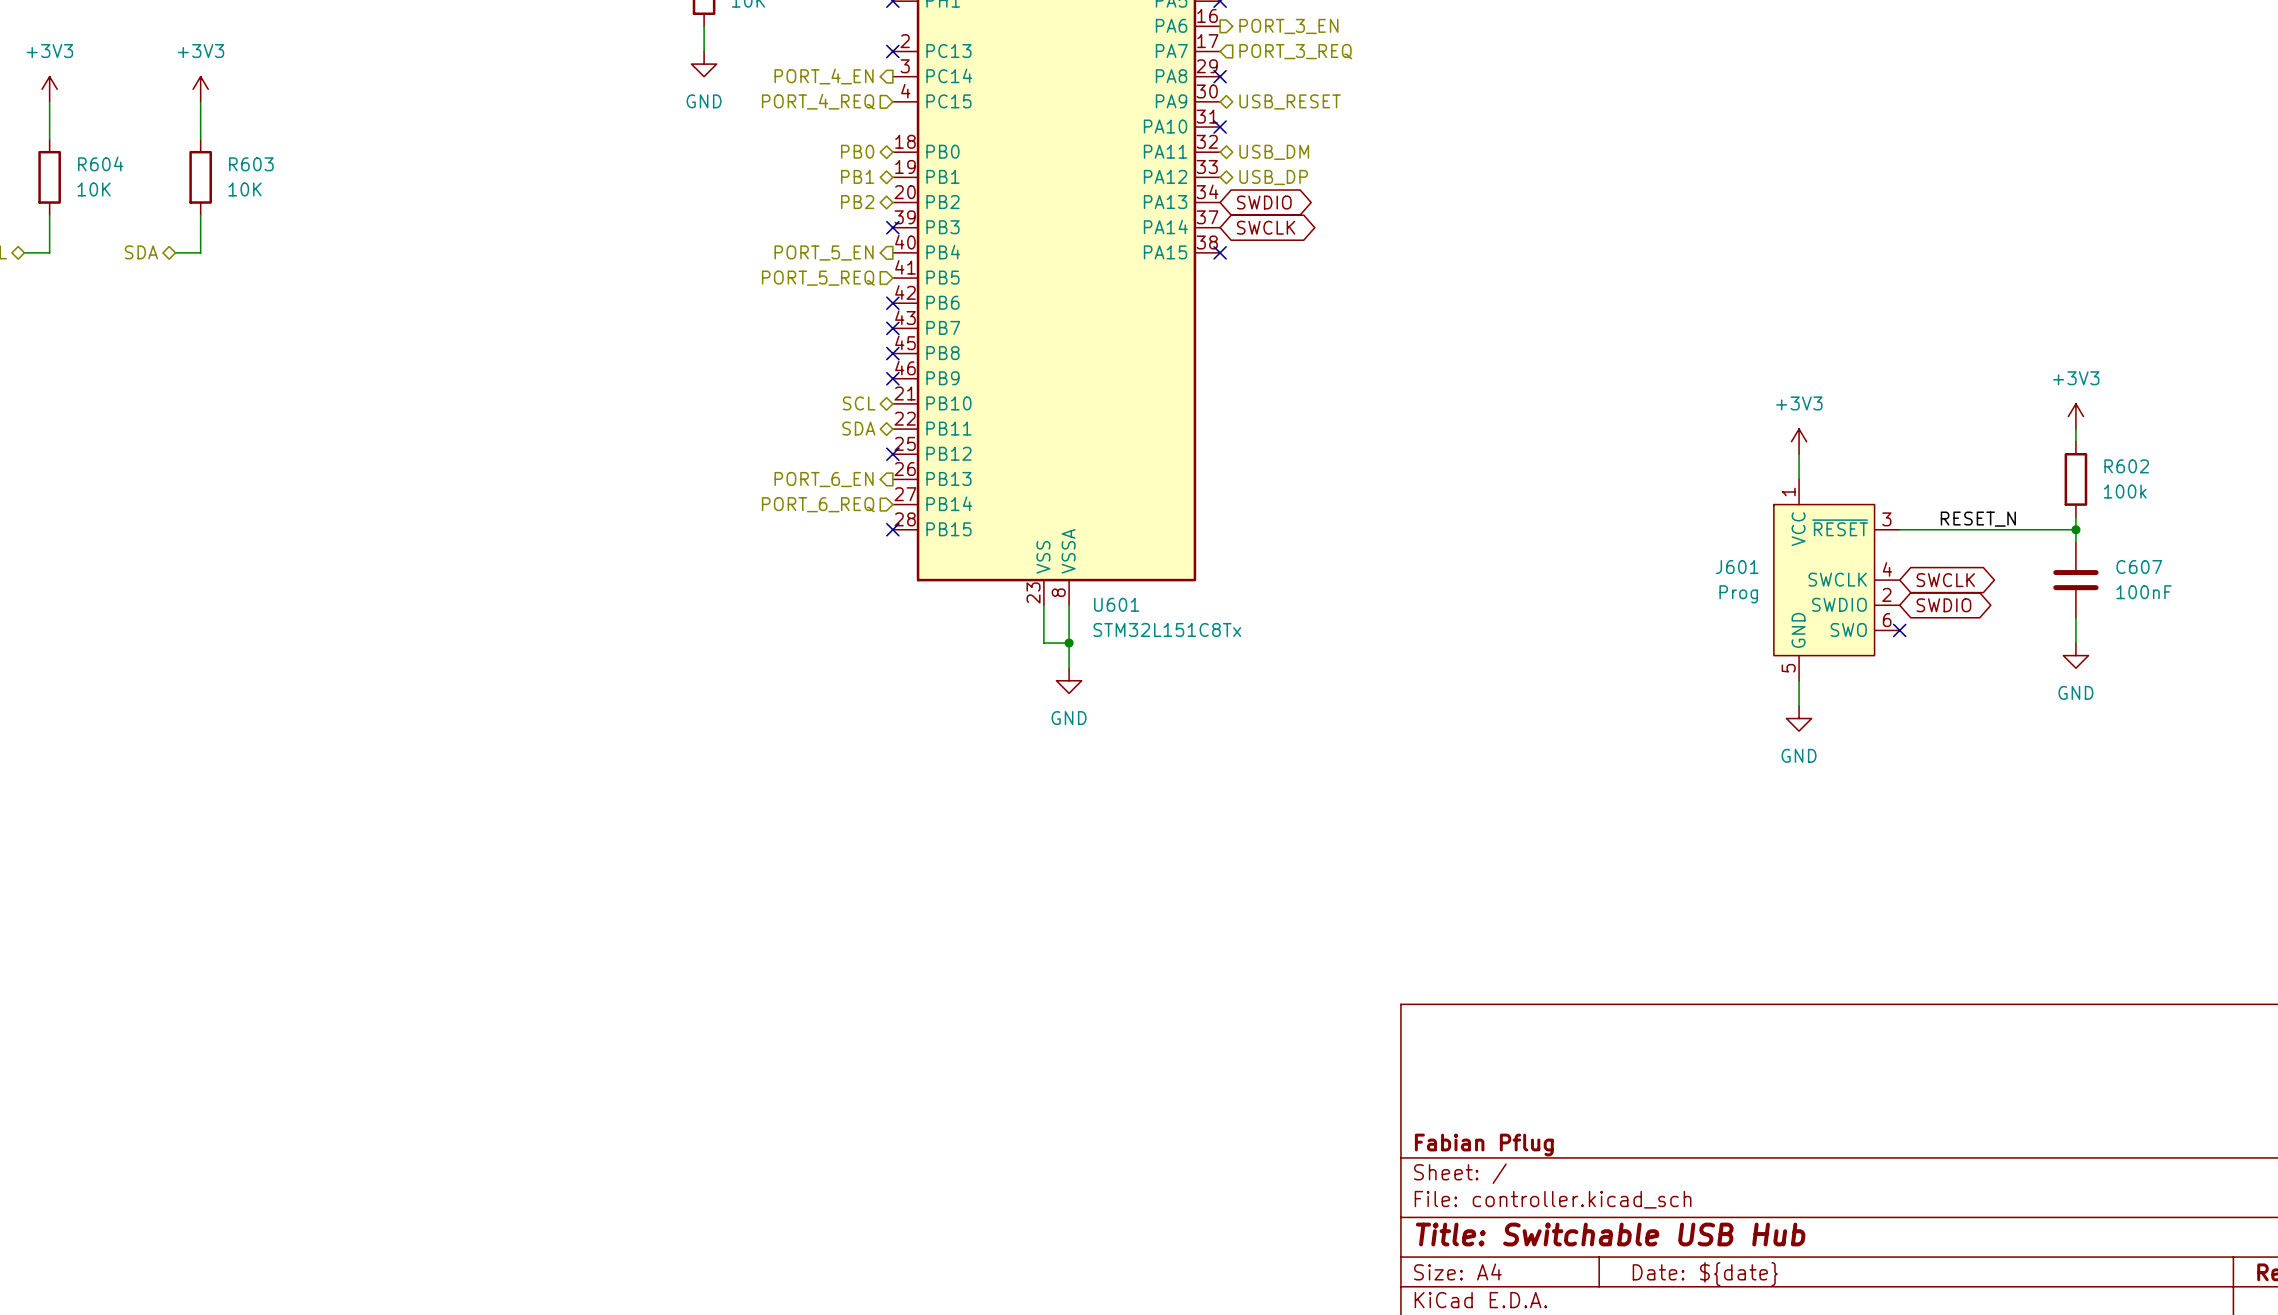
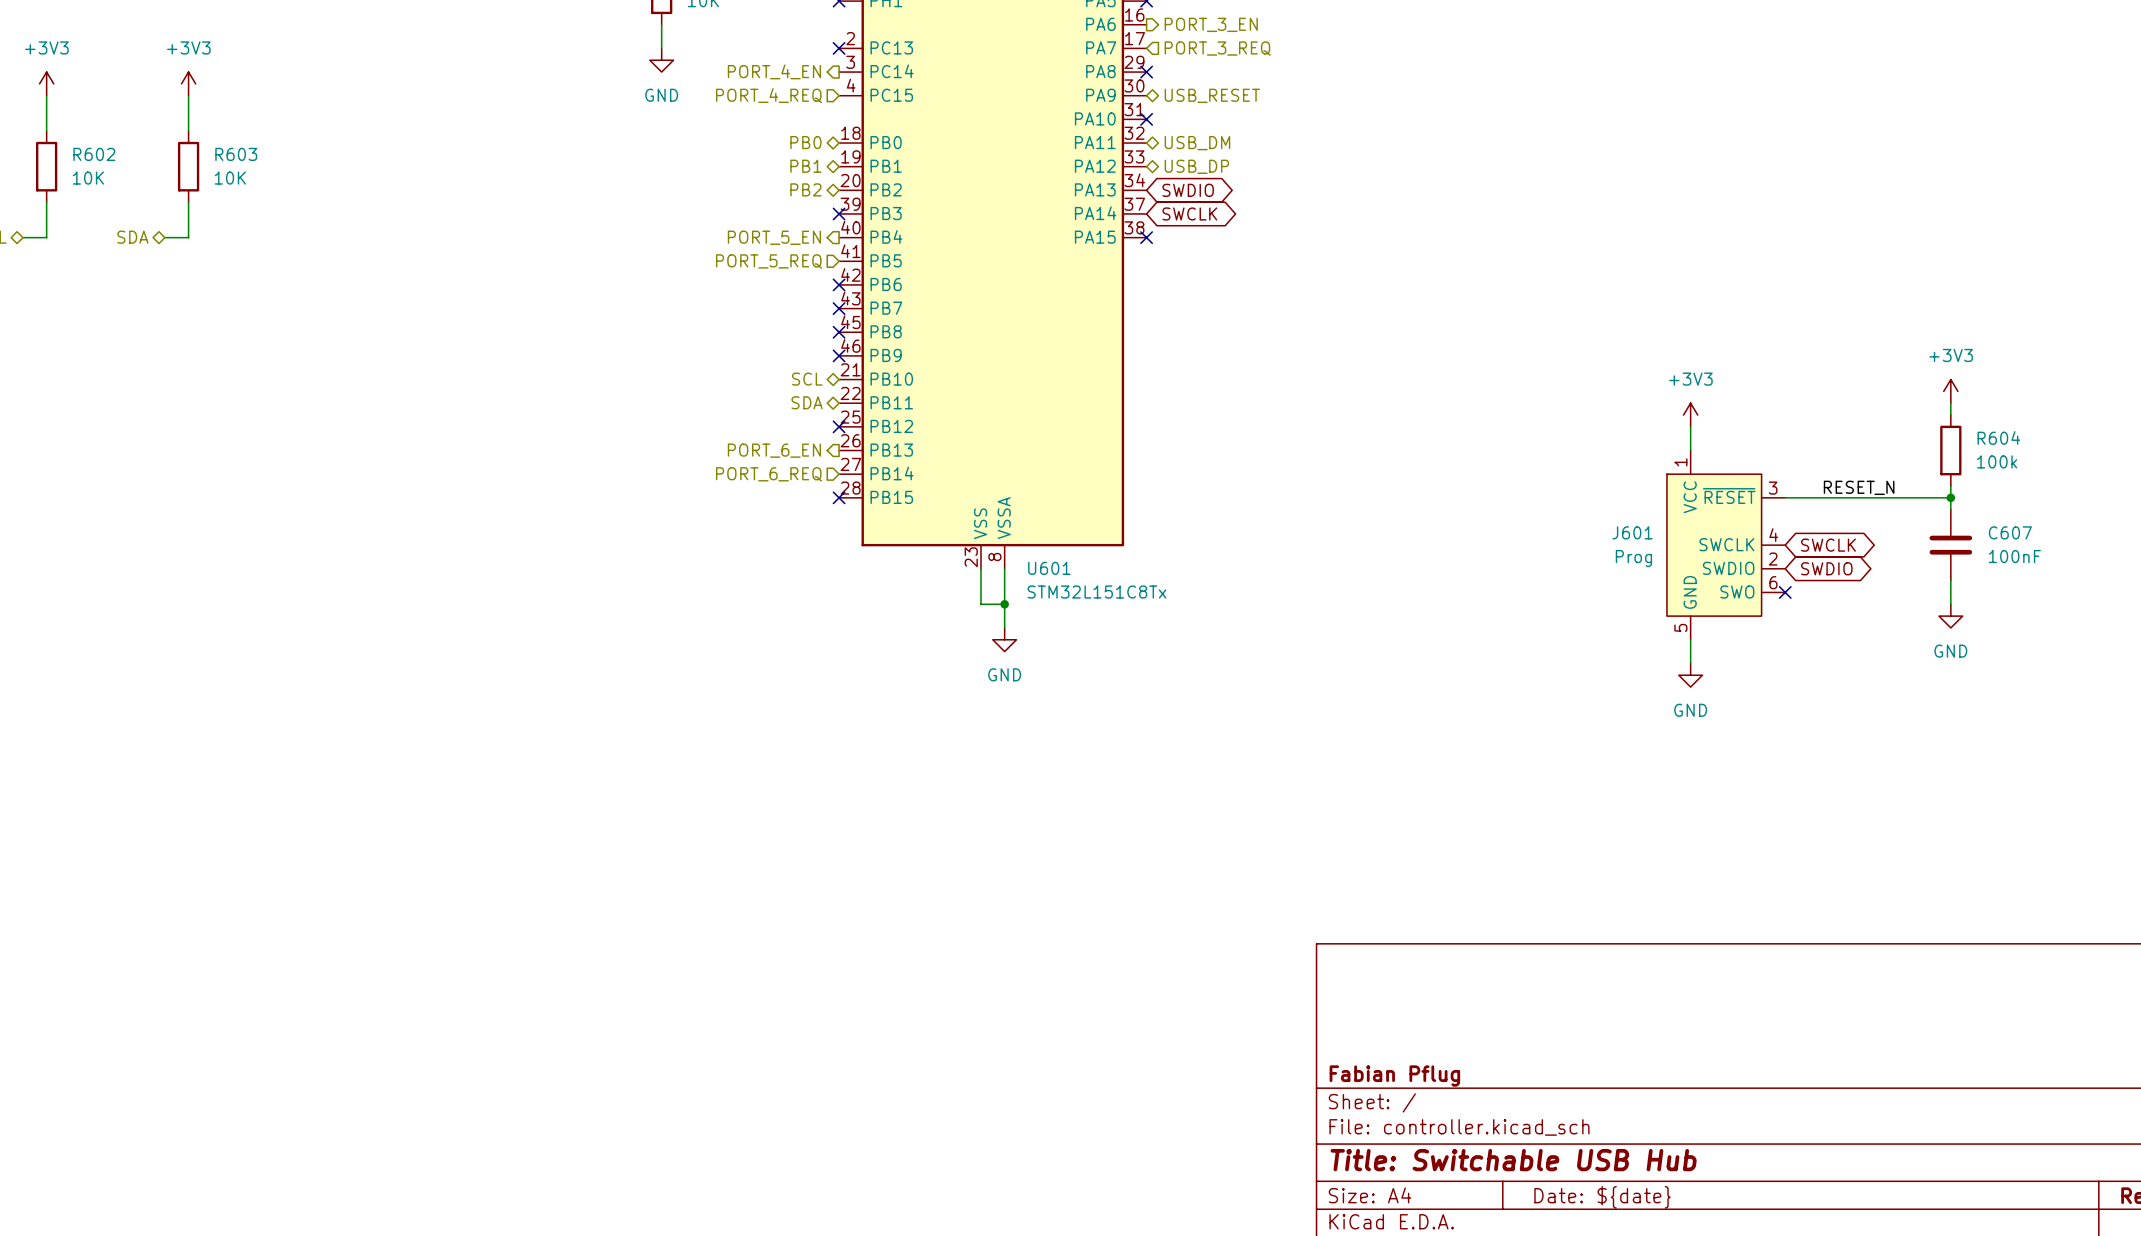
R604 name: R604 (100, 164) -> R602 (94, 154)
R602 name: R602 (2126, 466) -> R604 (1998, 437)

